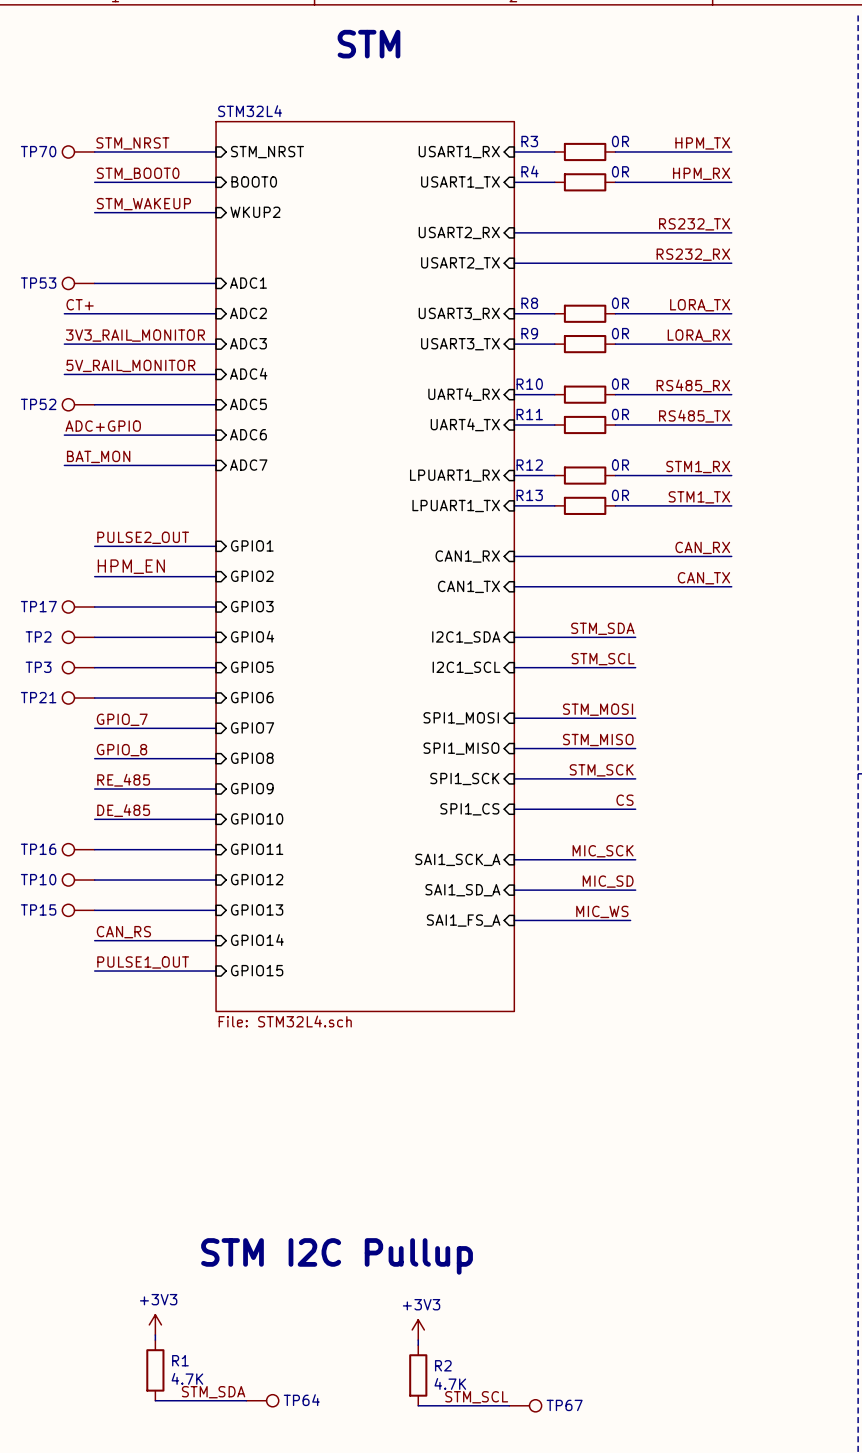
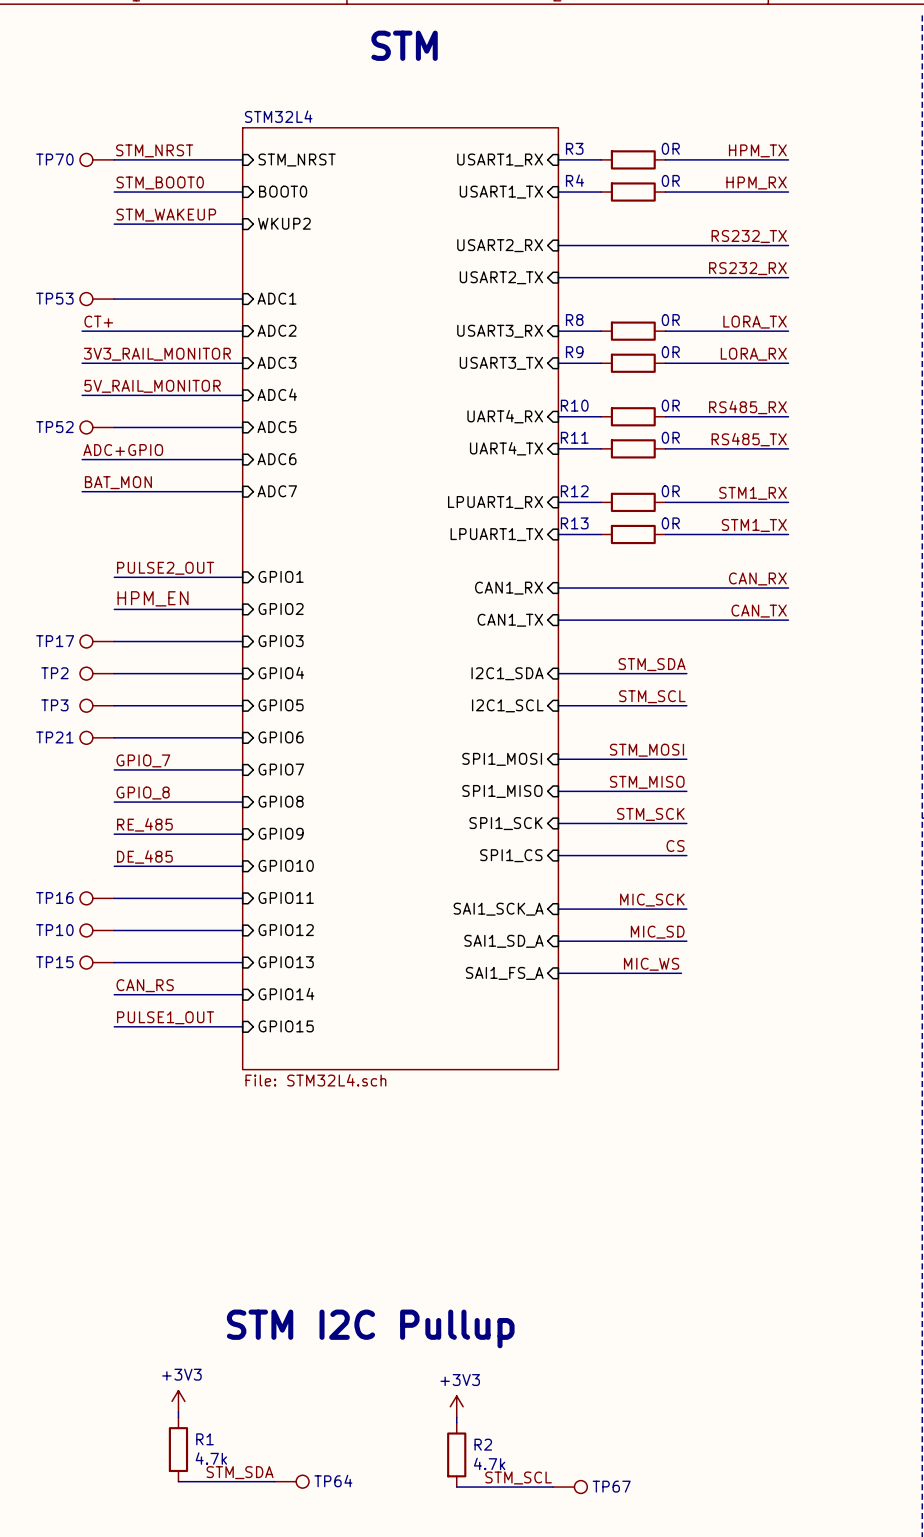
R1 value: 4.7K (187, 1378) -> 4.7k (211, 1458)
R2 value: 4.7K (450, 1383) -> 4.7k (489, 1463)

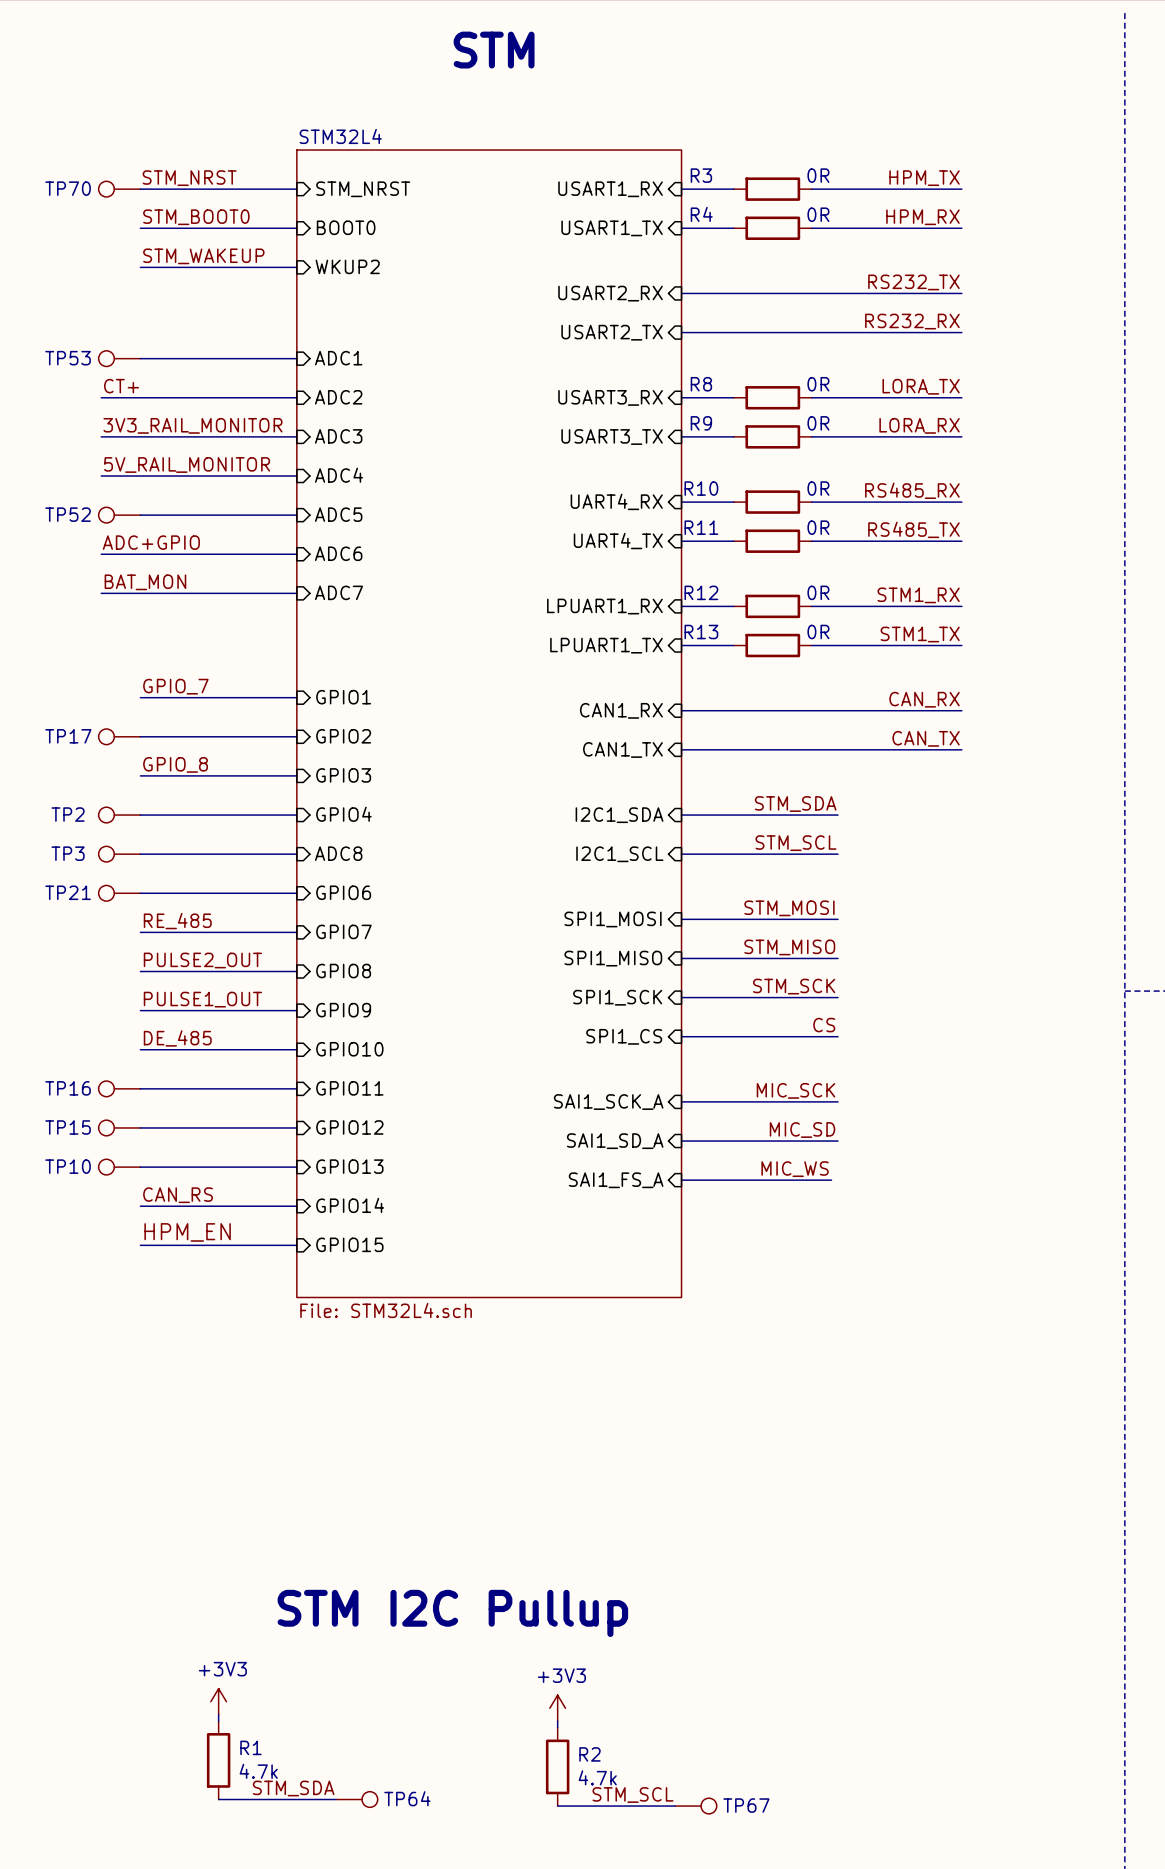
label: PULSE2_OUT (165, 568) -> GPIO_7 (175, 686)
label: HPM_EN (153, 598) -> none
label: none -> GPIO_8 (175, 764)
TP17 position: (97, 641) -> (119, 736)
sheet pin: GPIO5 (281, 705) -> ADC8 (338, 853)
label: GPIO_7 (143, 760) -> RE_485 (177, 921)
label: GPIO_8 (143, 793) -> PULSE2_OUT (202, 960)
label: RE_485 (144, 824) -> PULSE1_OUT (202, 999)
TP10 name: TP10 (54, 930) -> TP15 (68, 1127)
TP15 name: TP15 (54, 962) -> TP10 (68, 1166)
label: PULSE1_OUT (165, 1017) -> HPM_EN (187, 1232)

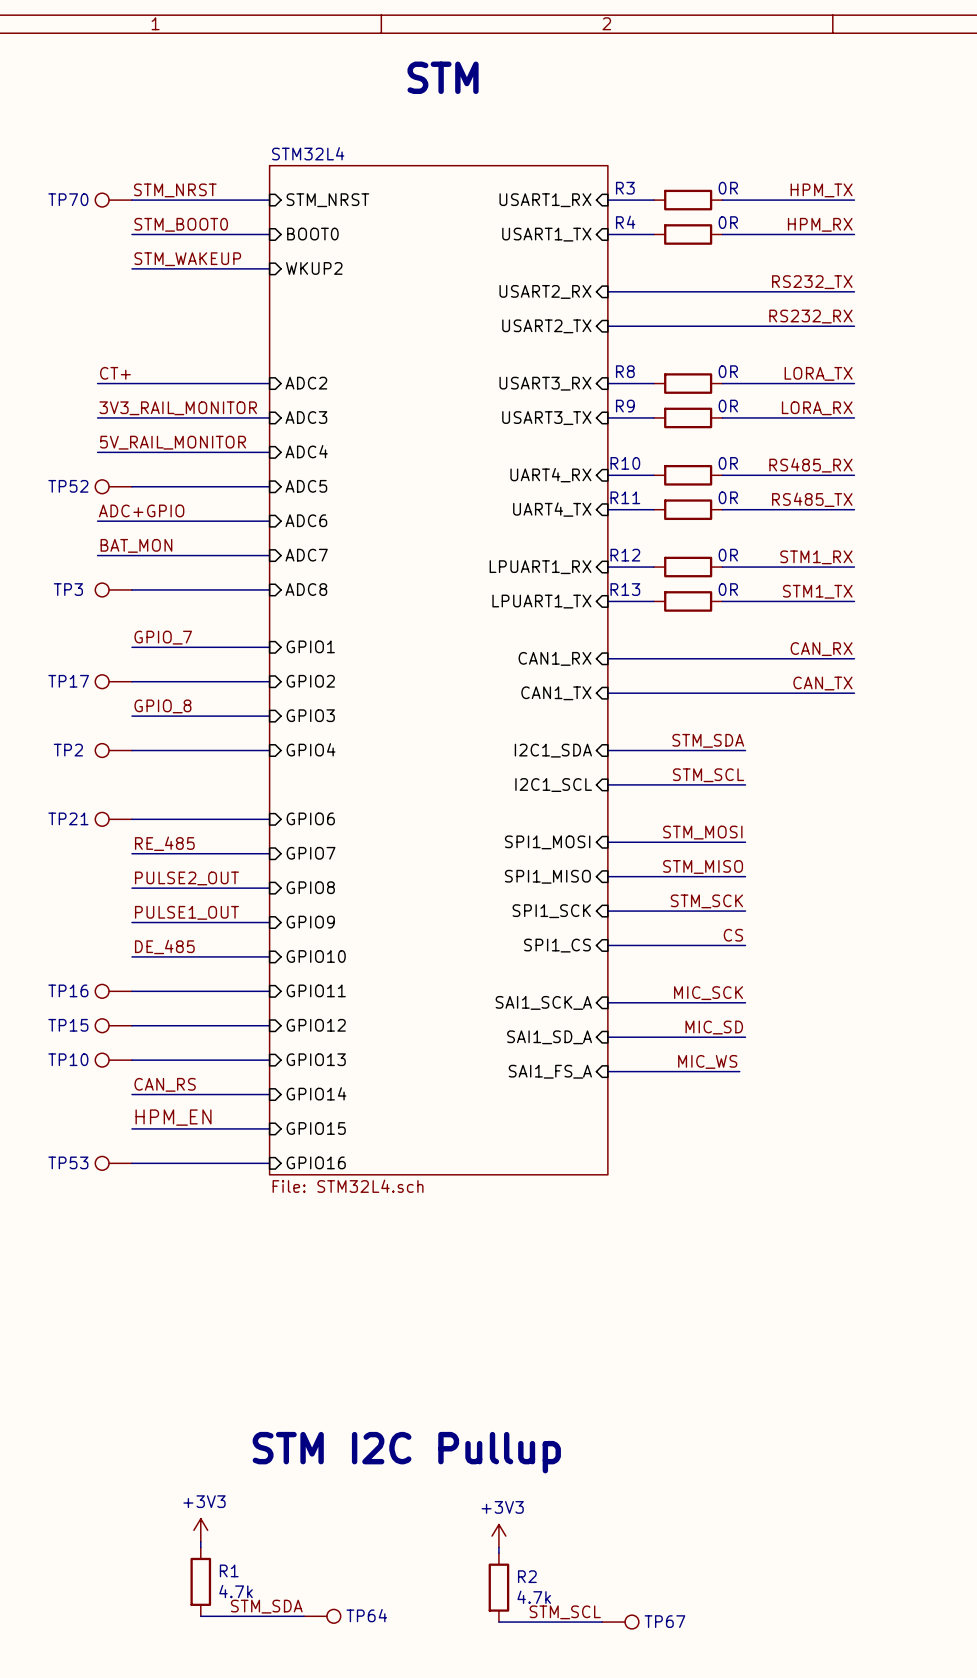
TP53 position: (119, 358) -> (113, 1163)
wire: (140, 358) (296, 358) -> none
sheet pin: ADC1 (338, 358) -> none
sheet pin position: ADC8 (338, 853) -> ADC8 (306, 589)
TP3 position: (119, 854) -> (113, 589)
wire: (140, 854) (296, 854) -> (131, 589) (269, 589)
sheet pin: none -> GPIO16 (316, 1162)
wire: none -> (131, 1163) (269, 1163)

